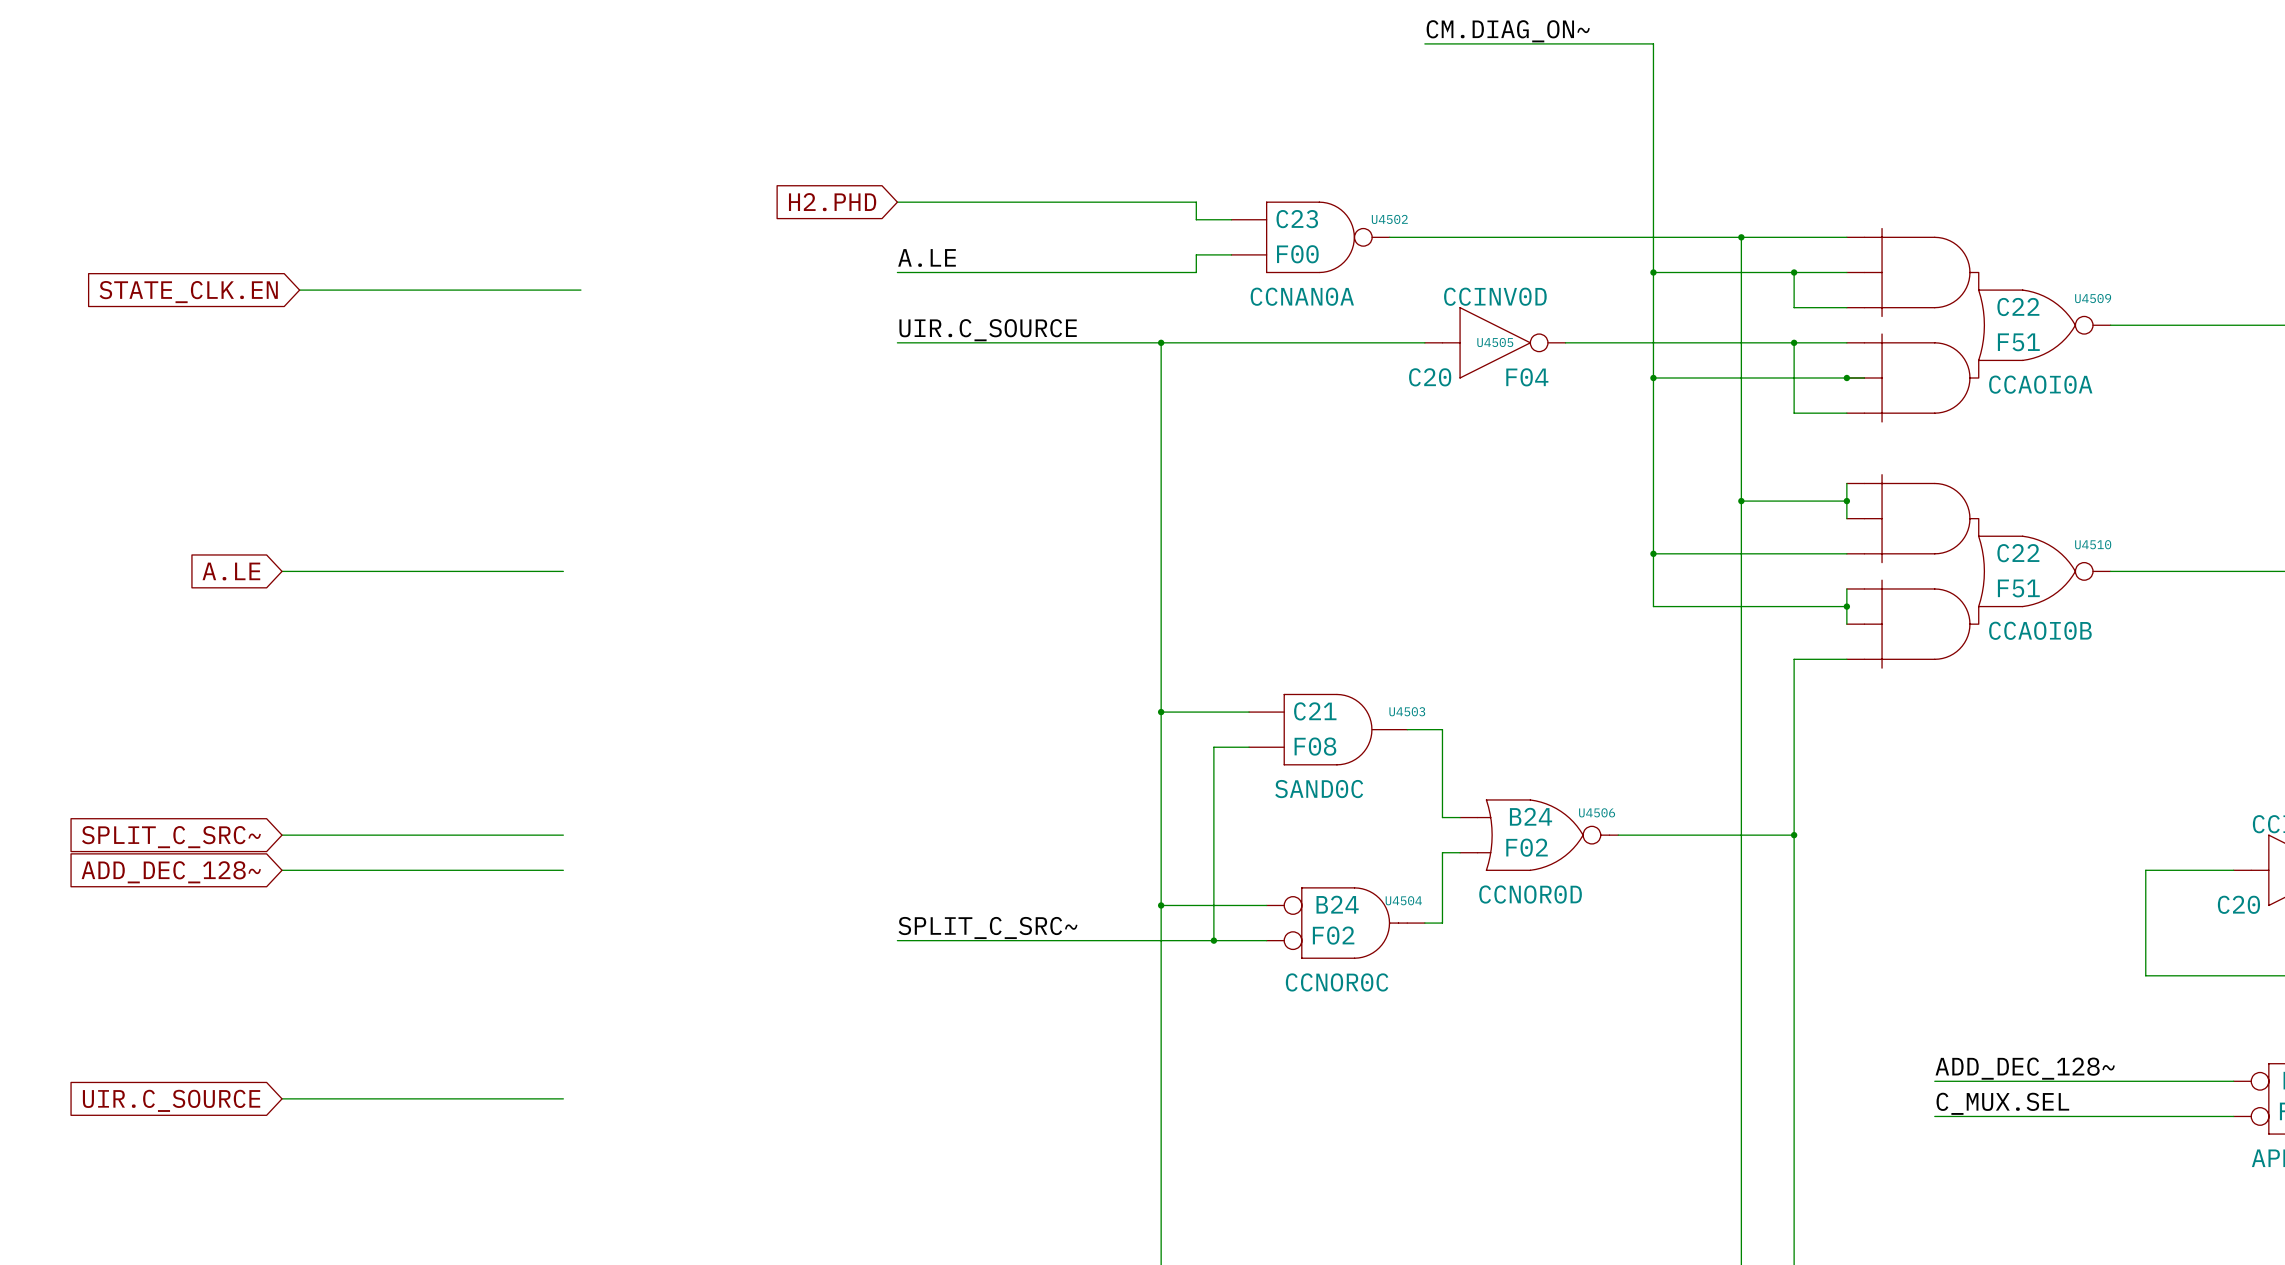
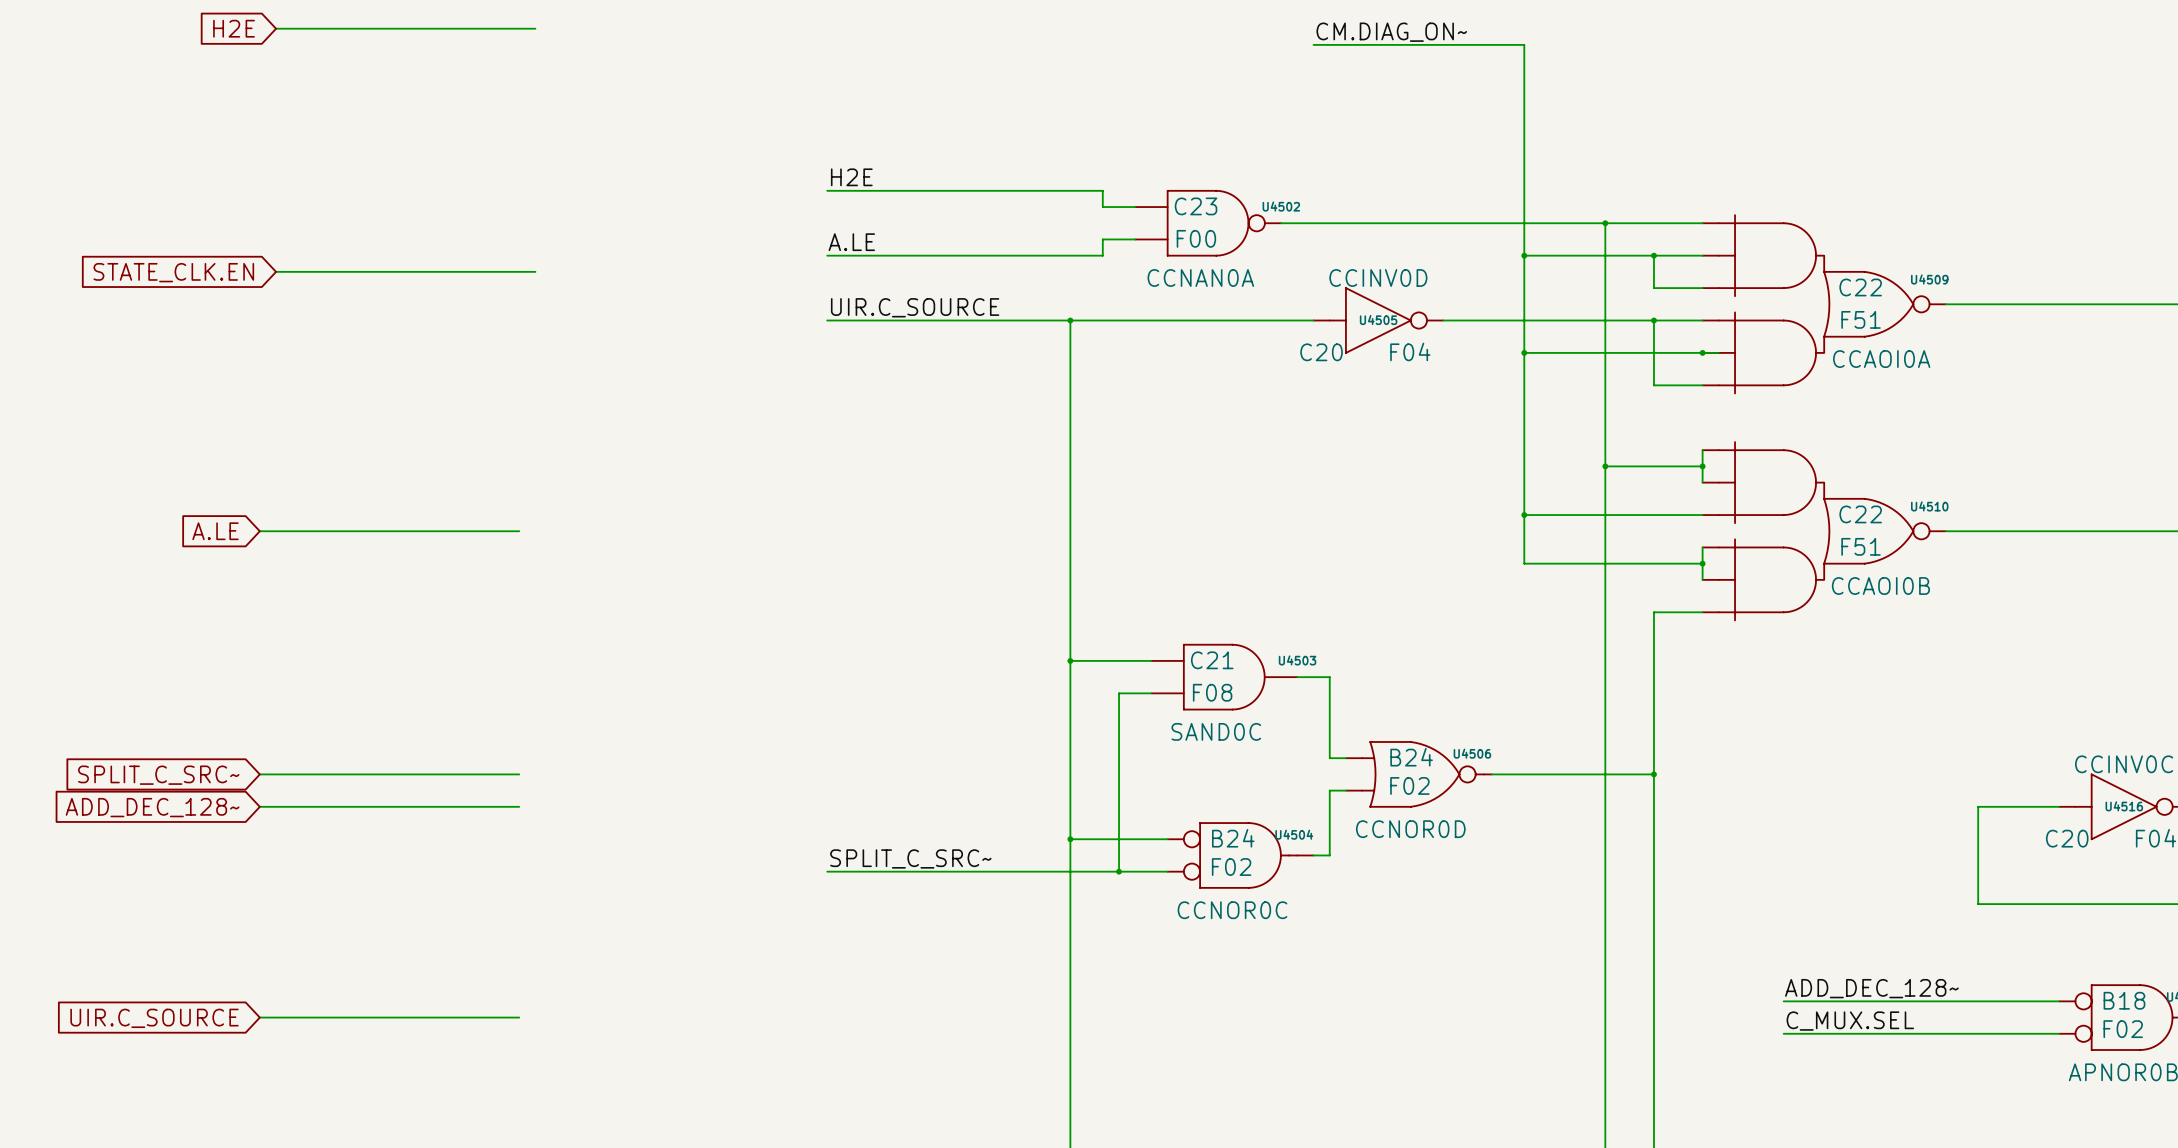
global label: none -> H2E (234, 28)
wire: none -> (276, 28) (535, 28)
label: none -> H2E (851, 177)
global label: H2.PHD (832, 202) -> none

